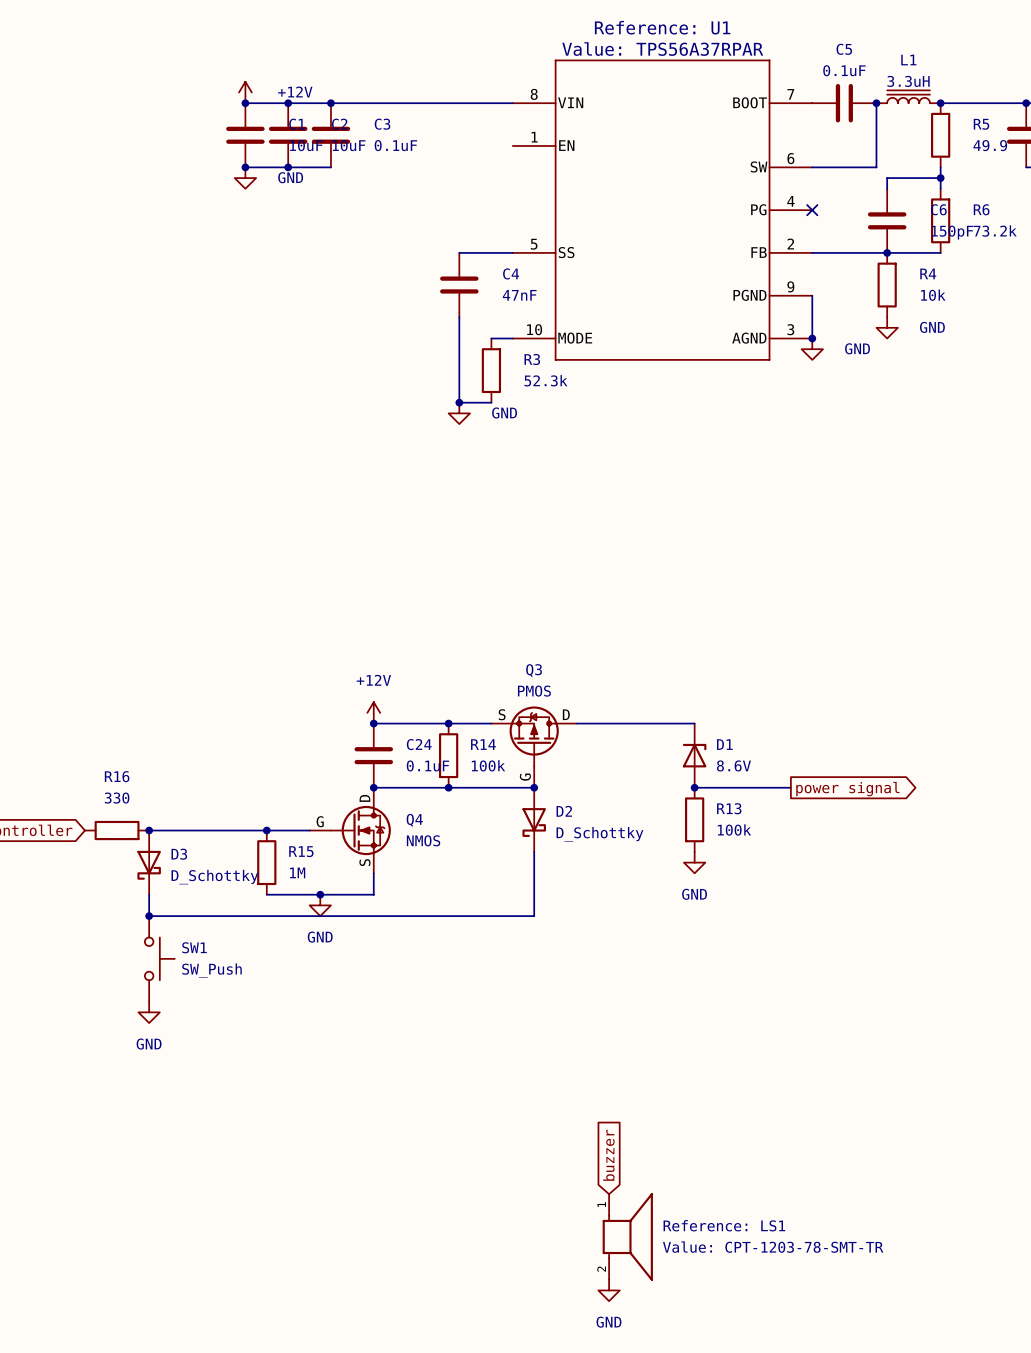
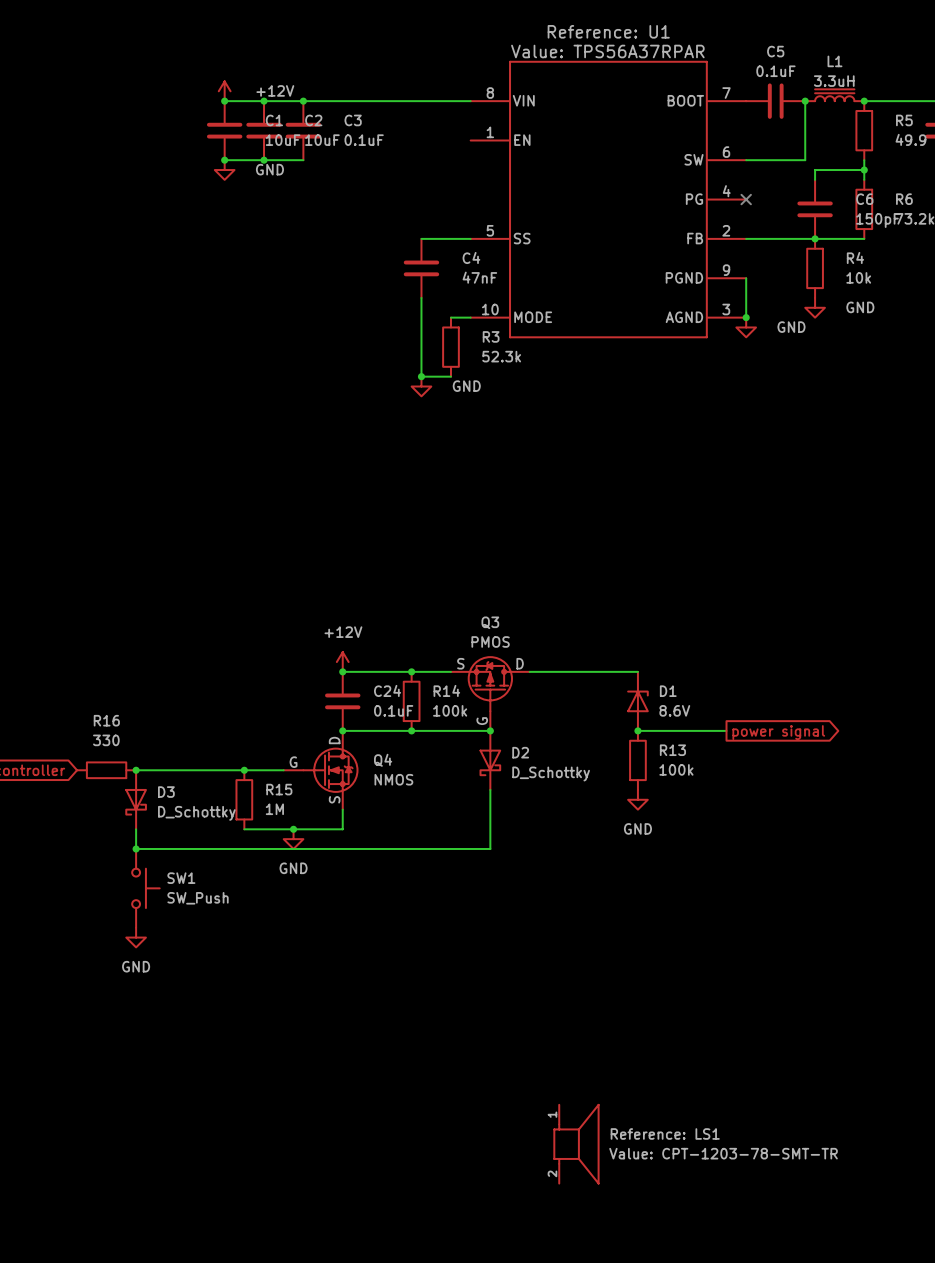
global label: buzzer (608, 1155) -> none
power symbol: GND (609, 1290) -> none

